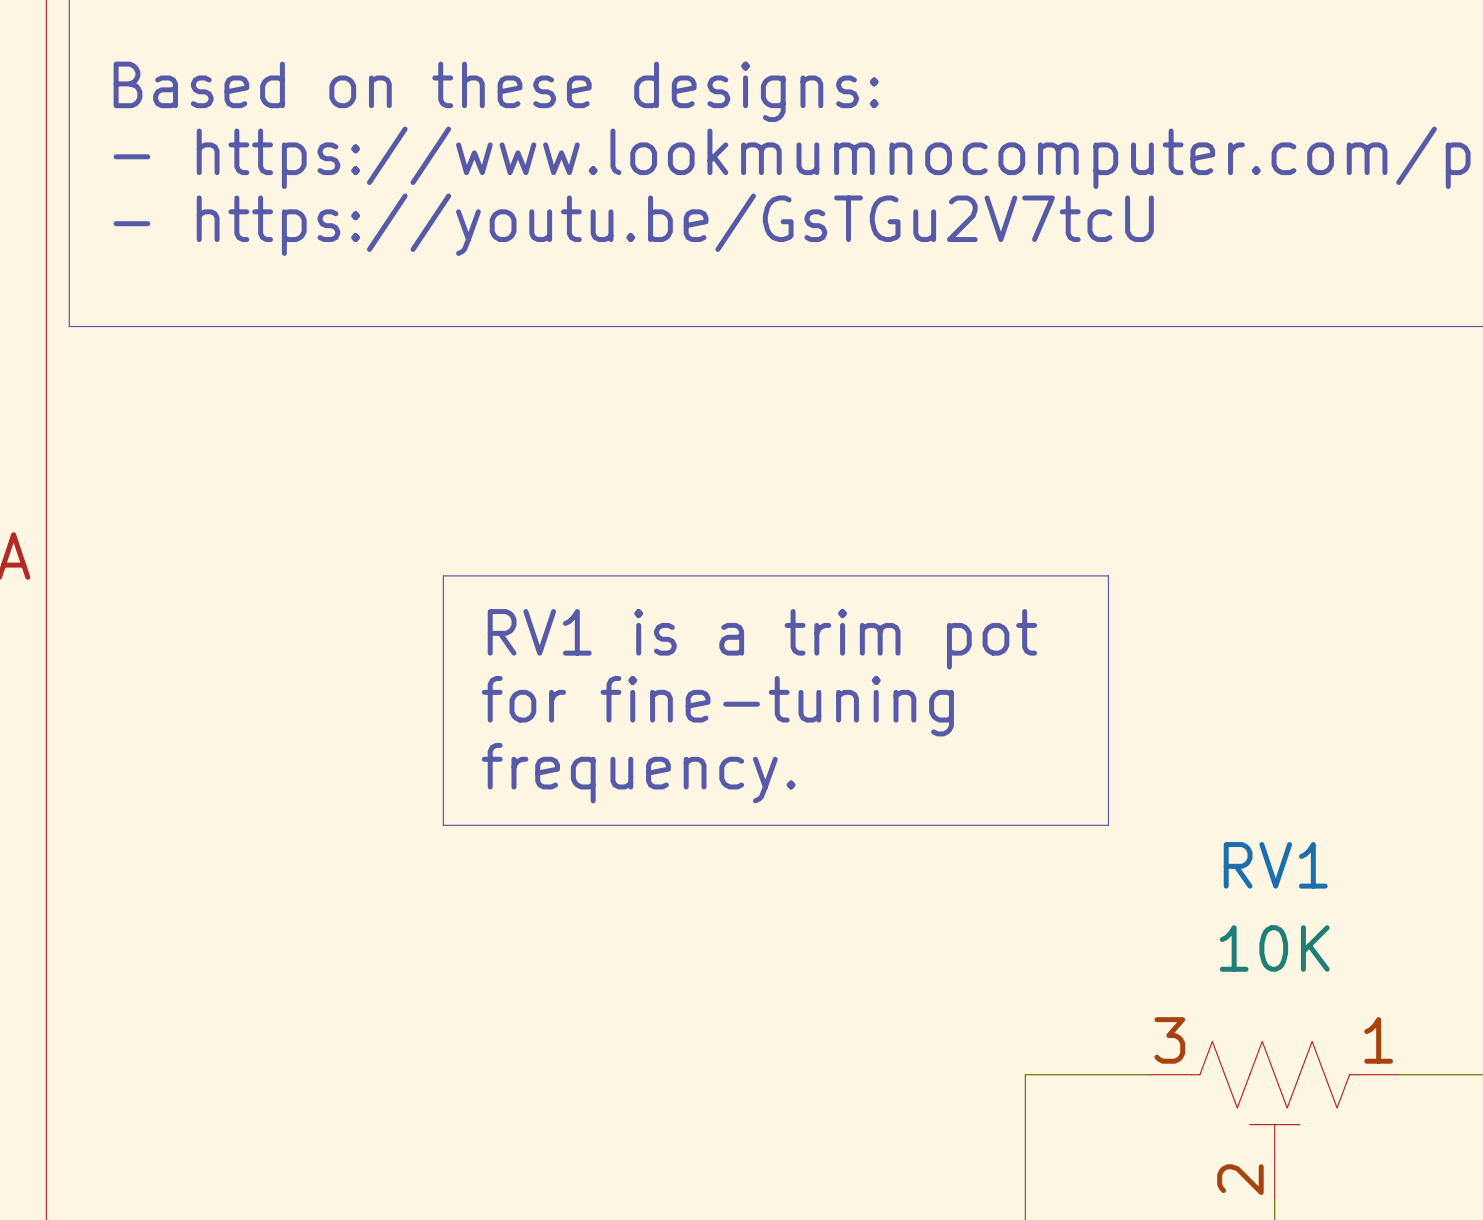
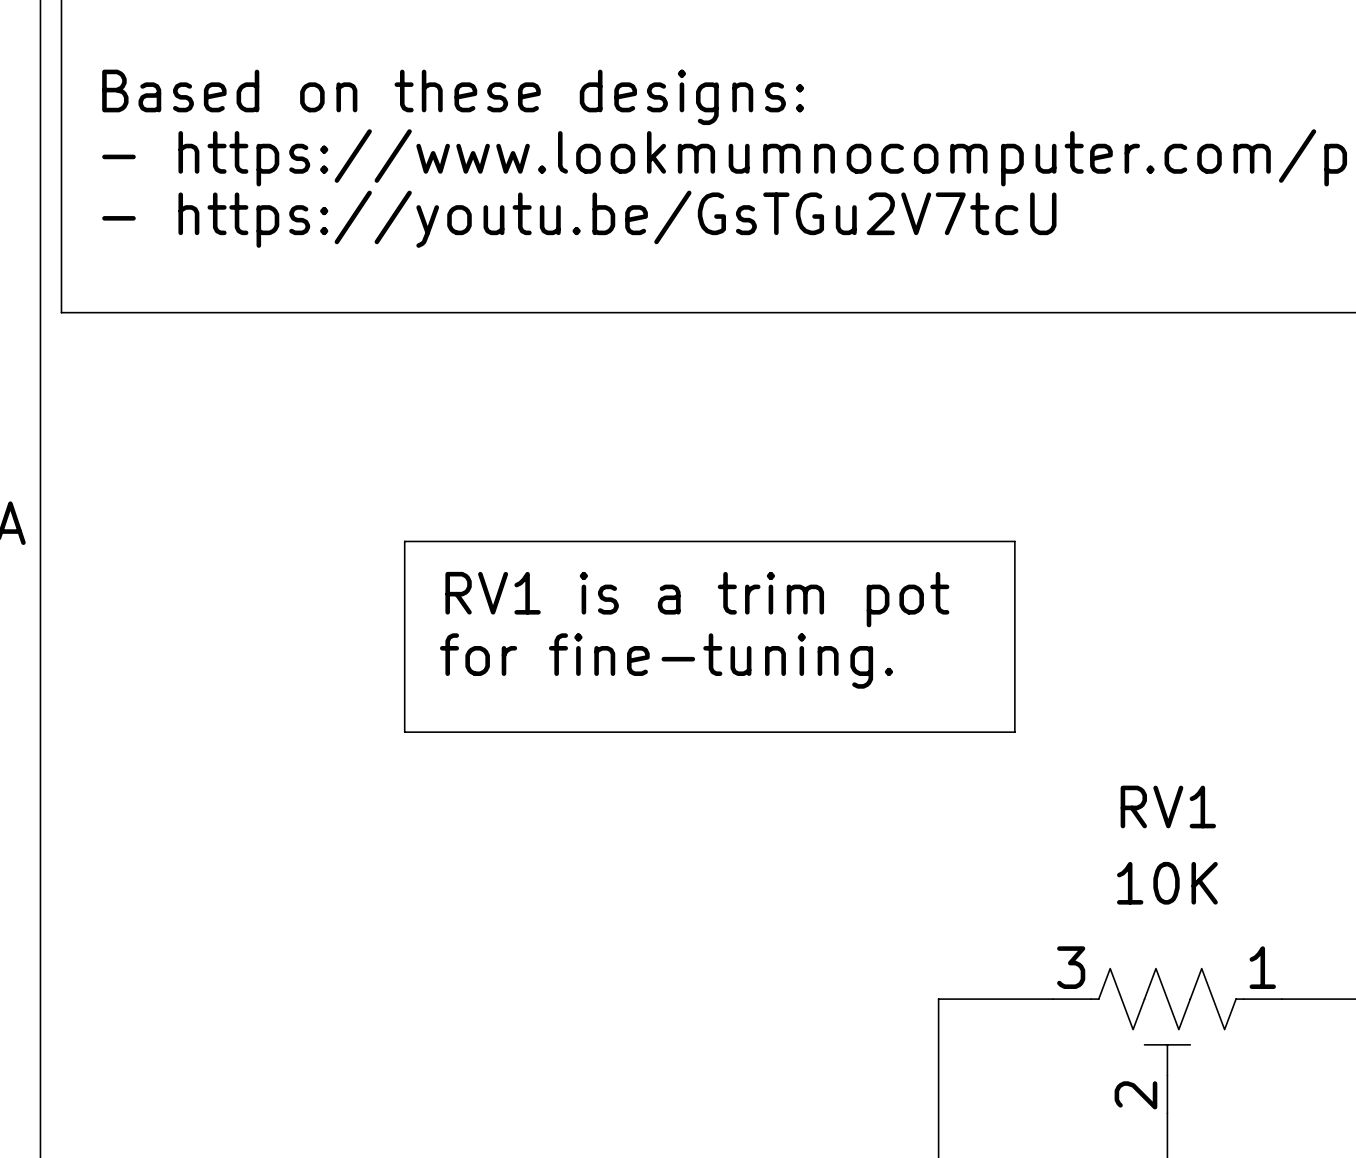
text: for fine-tuning (717, 706) -> for fine-tuning. (666, 661)
text: frequency. (638, 773) -> none
line: (443, 783) (443, 825) (1108, 825) (1108, 783) -> (404, 732) (1014, 732)

